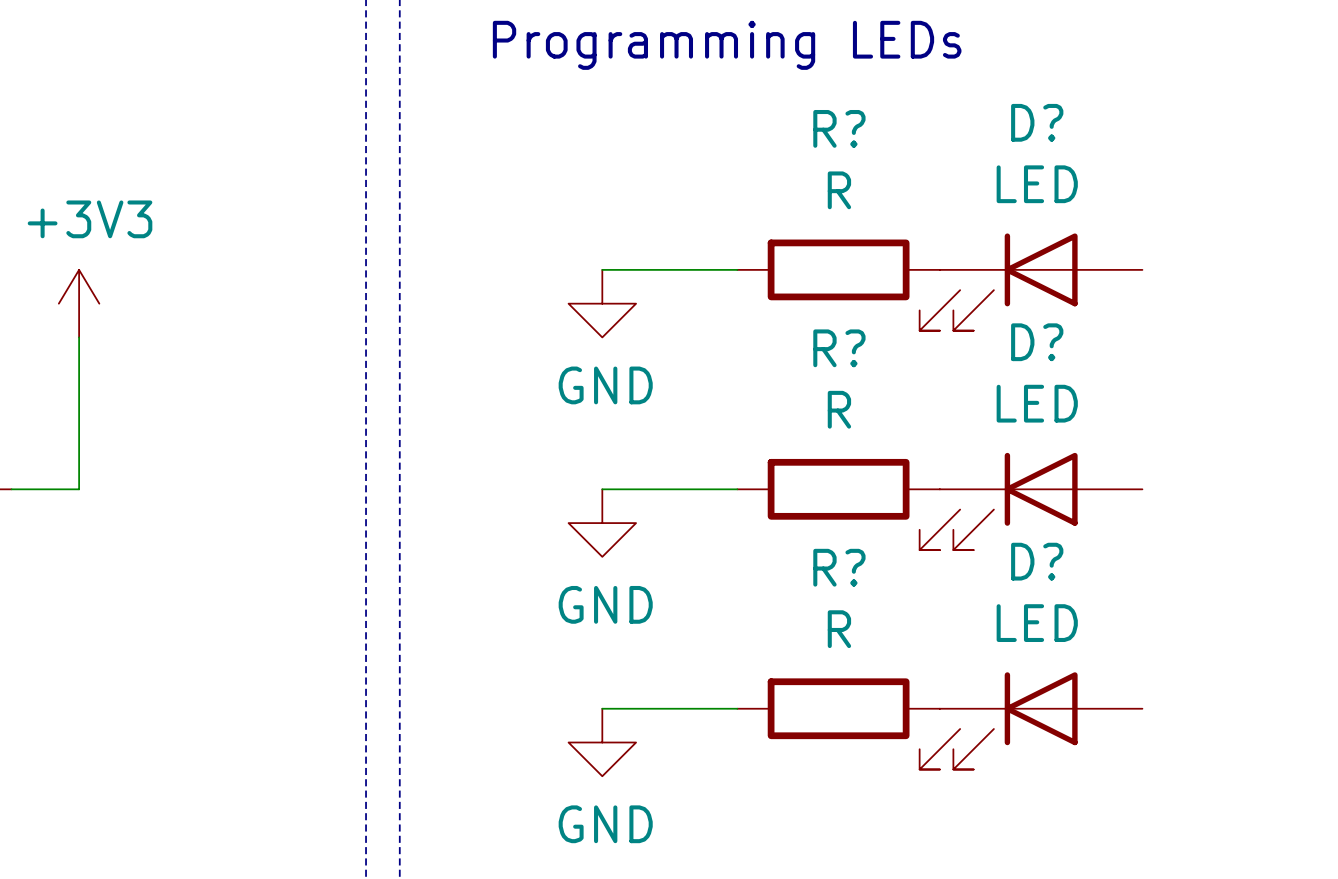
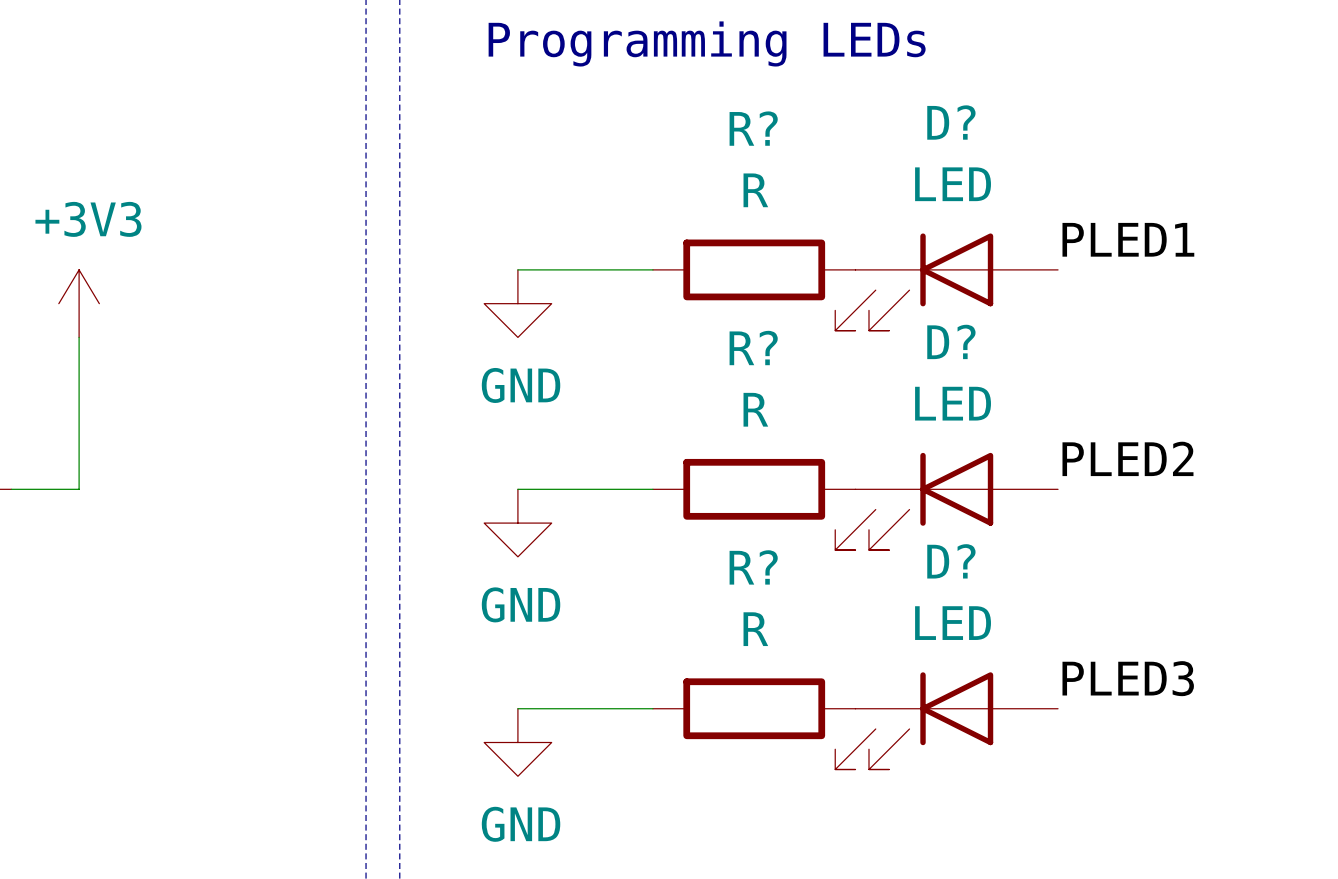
label: none -> PLED1 (1128, 239)
wire: (652, 269) (737, 269) -> (517, 269) (602, 269)
R? position: (838, 269) -> (754, 269)
D? position: (1031, 282) -> (946, 282)
power symbol position: GND (602, 303) -> GND (517, 303)
label: none -> PLED2 (1127, 458)
wire: (652, 489) (737, 489) -> (517, 489) (602, 489)
R? position: (838, 489) -> (754, 489)
D? position: (1031, 501) -> (946, 501)
power symbol position: GND (602, 523) -> GND (517, 523)
label: none -> PLED3 (1128, 678)
wire: (652, 708) (737, 708) -> (517, 708) (602, 708)
R? position: (838, 708) -> (754, 708)
D? position: (1031, 720) -> (946, 720)
power symbol position: GND (602, 742) -> GND (517, 742)

